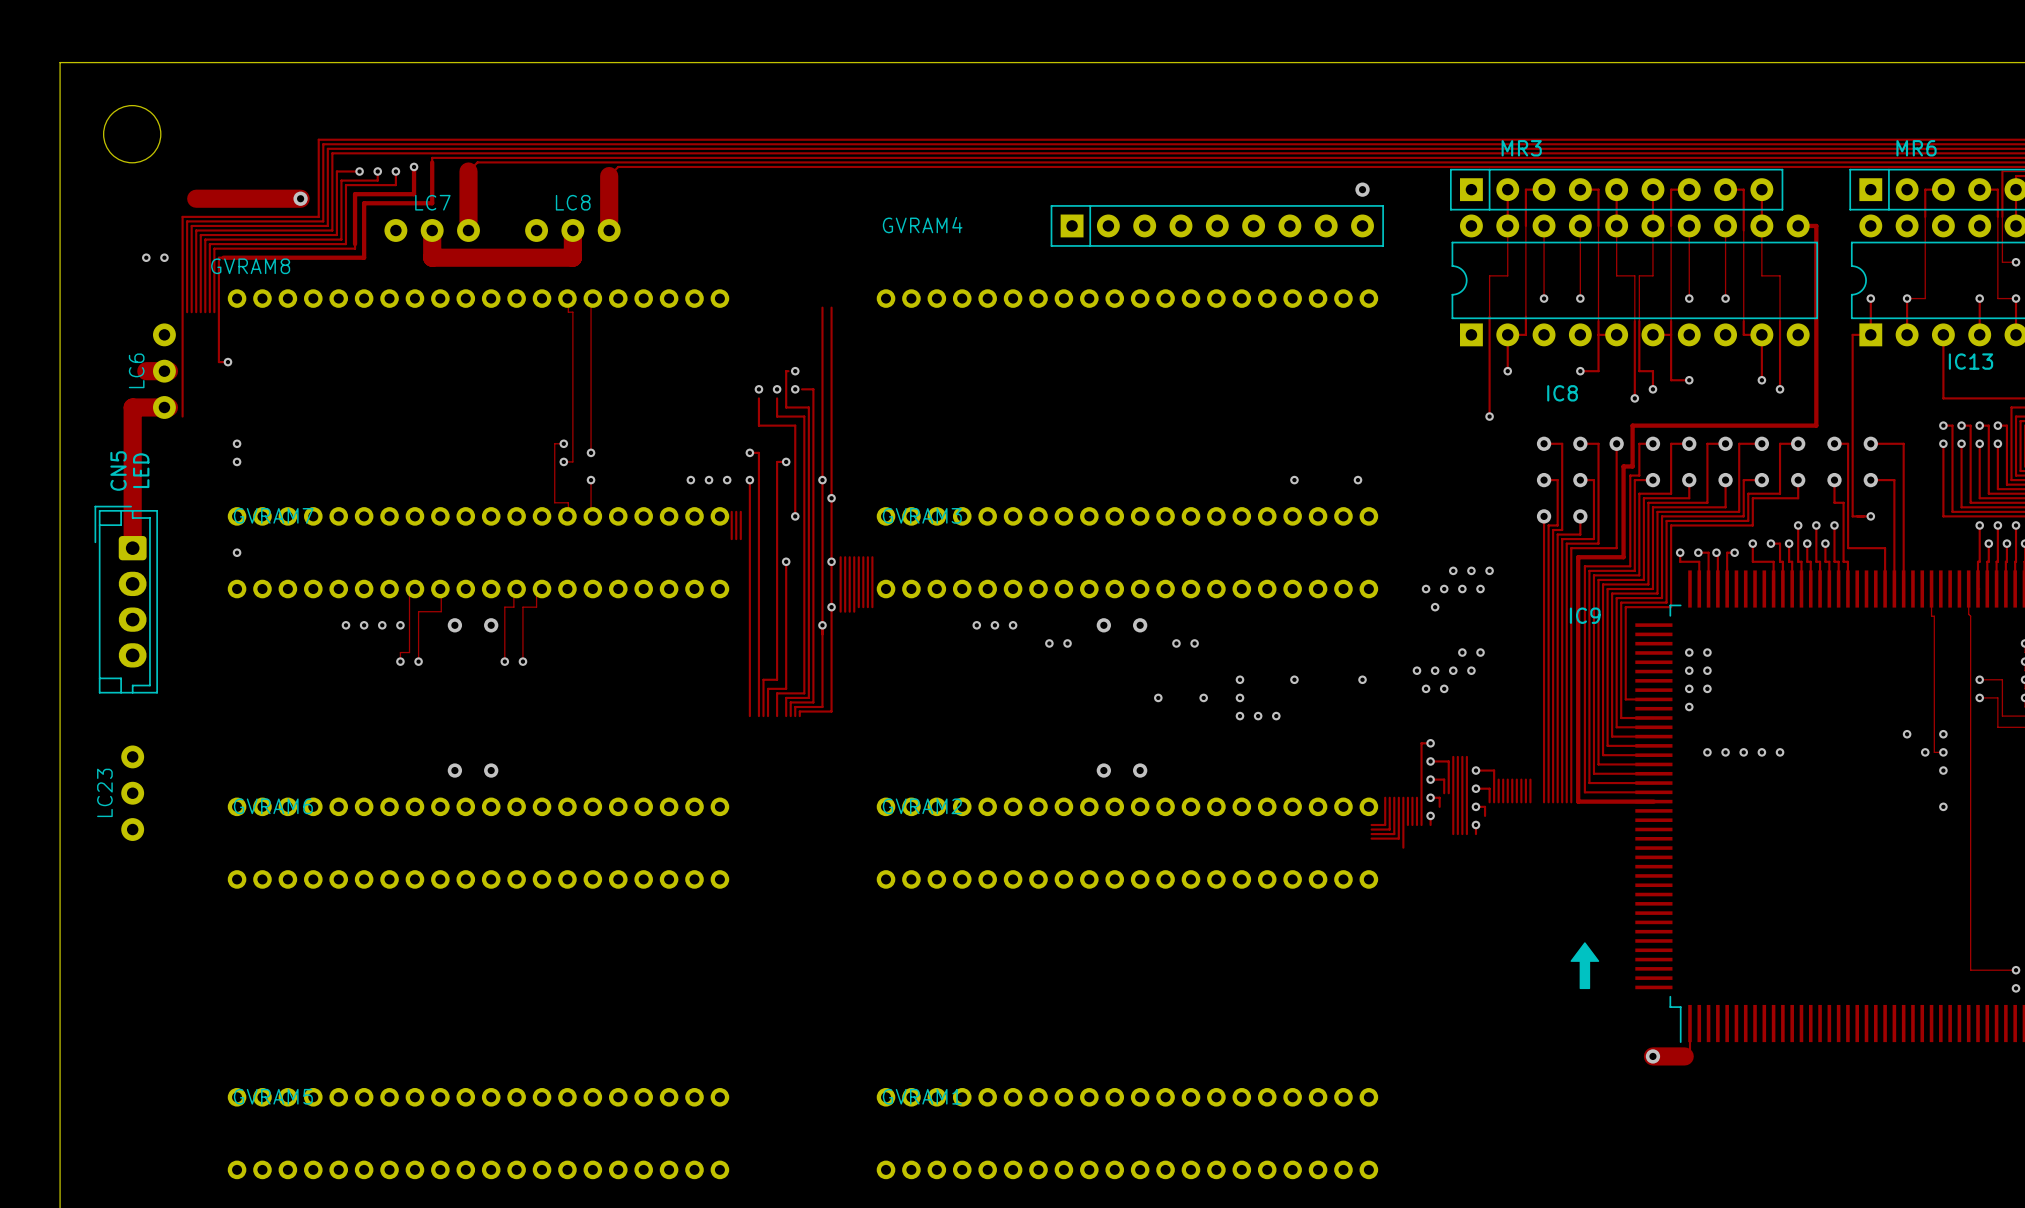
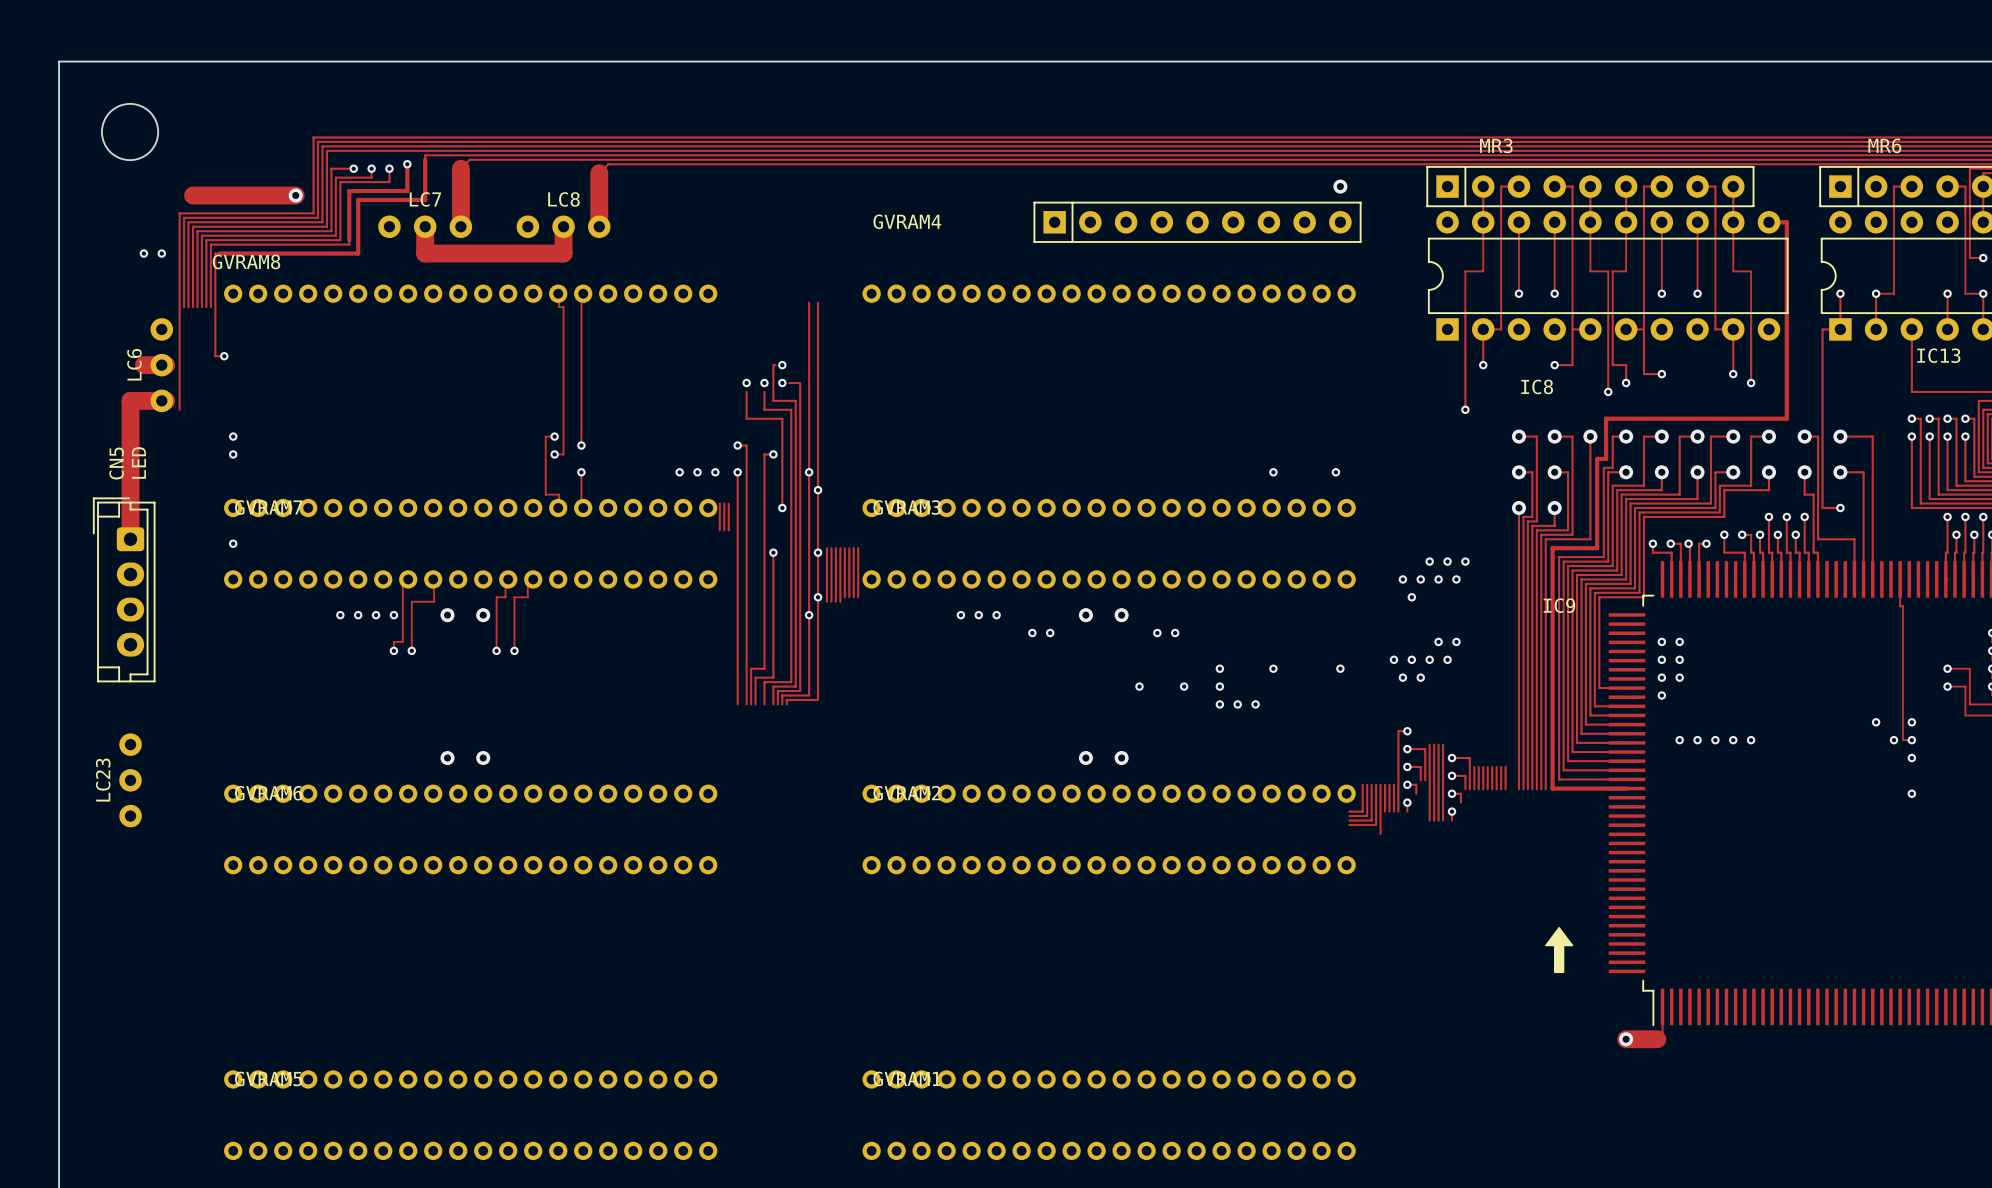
track: (1968, 589) (1968, 614) (1970, 616) (1970, 970) (2016, 970) -> none
via: (2016, 970) -> none
via: (2016, 988) -> none

